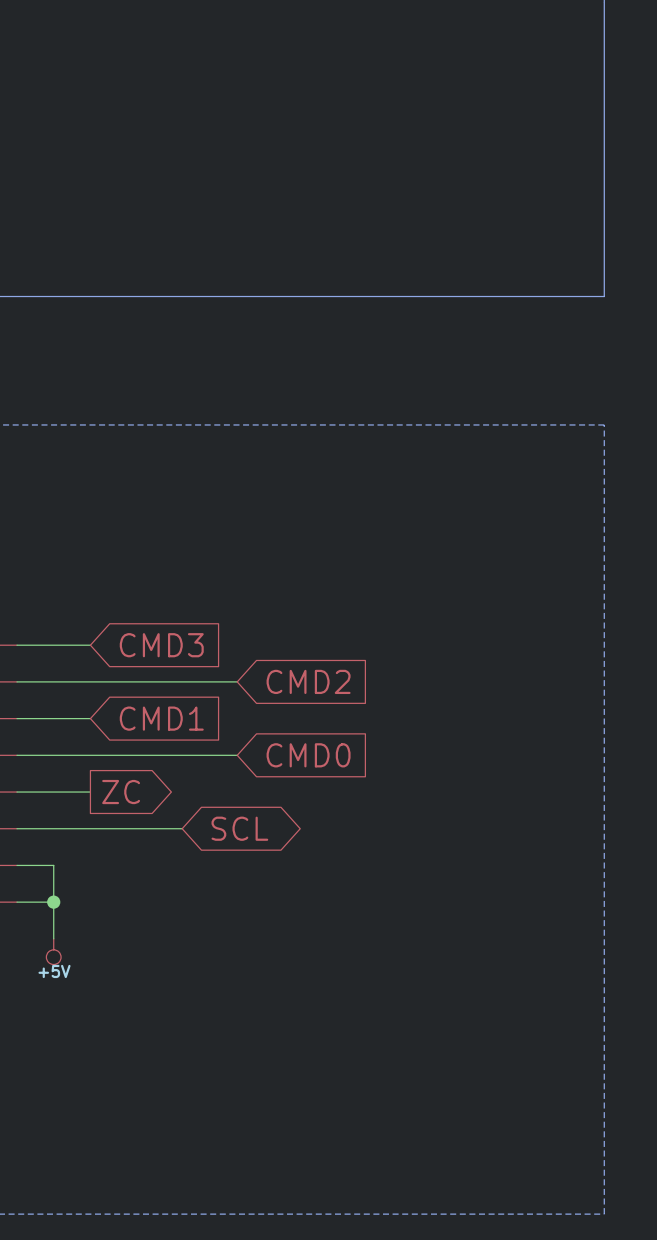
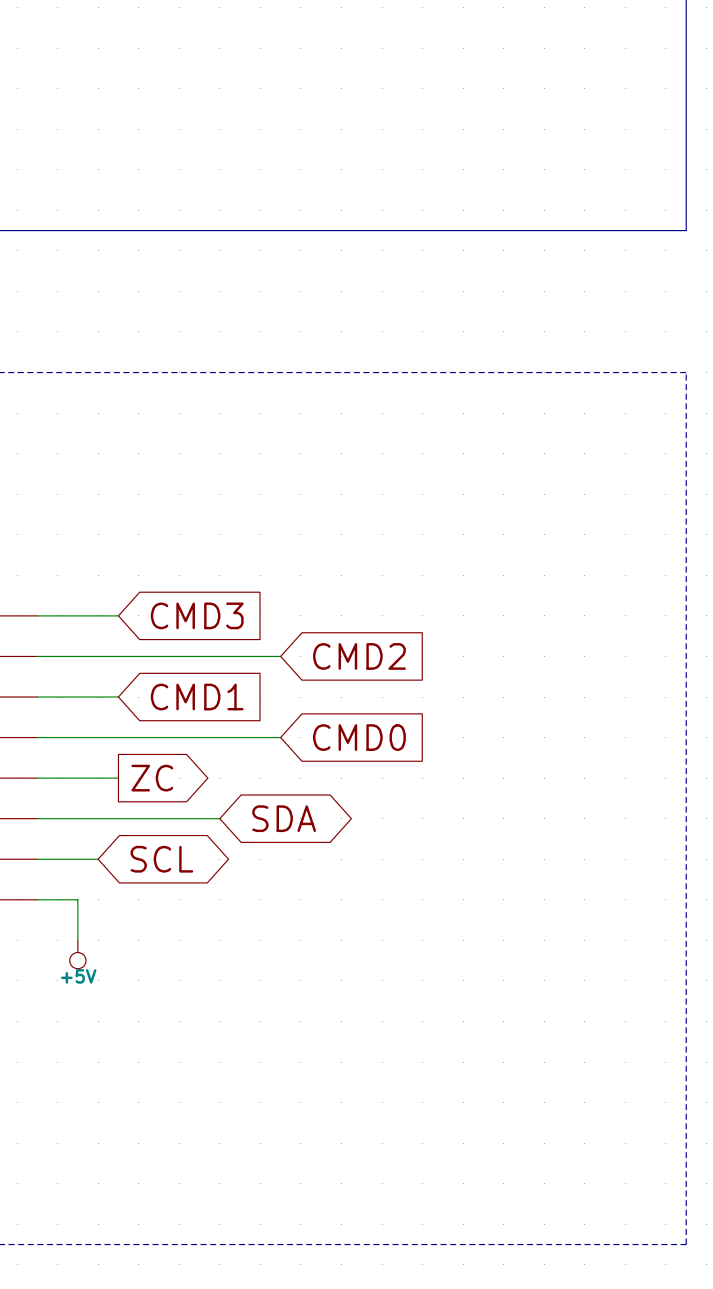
global label: SCL (239, 828) -> SDA (284, 818)
wire: (53, 865) (53, 902) -> (77, 859) (98, 859)
global label: none -> SCL (161, 859)
junction: (53, 902) -> none

